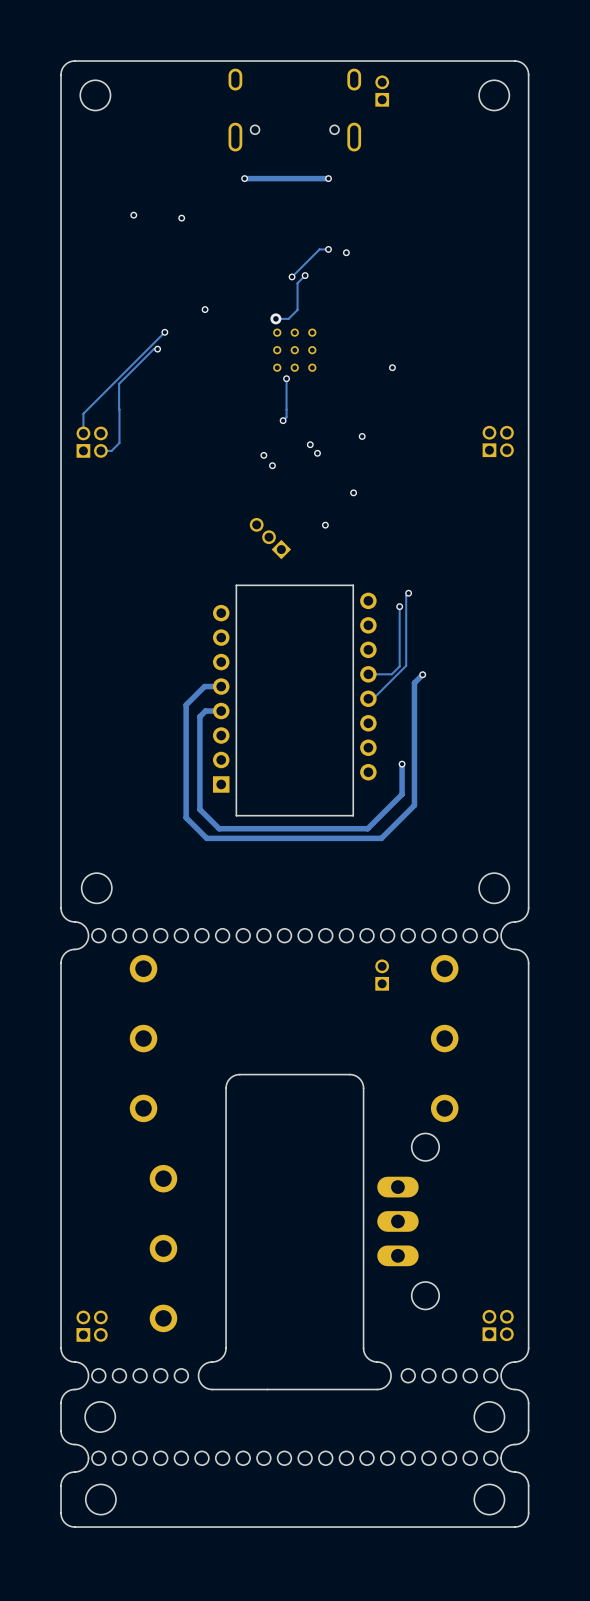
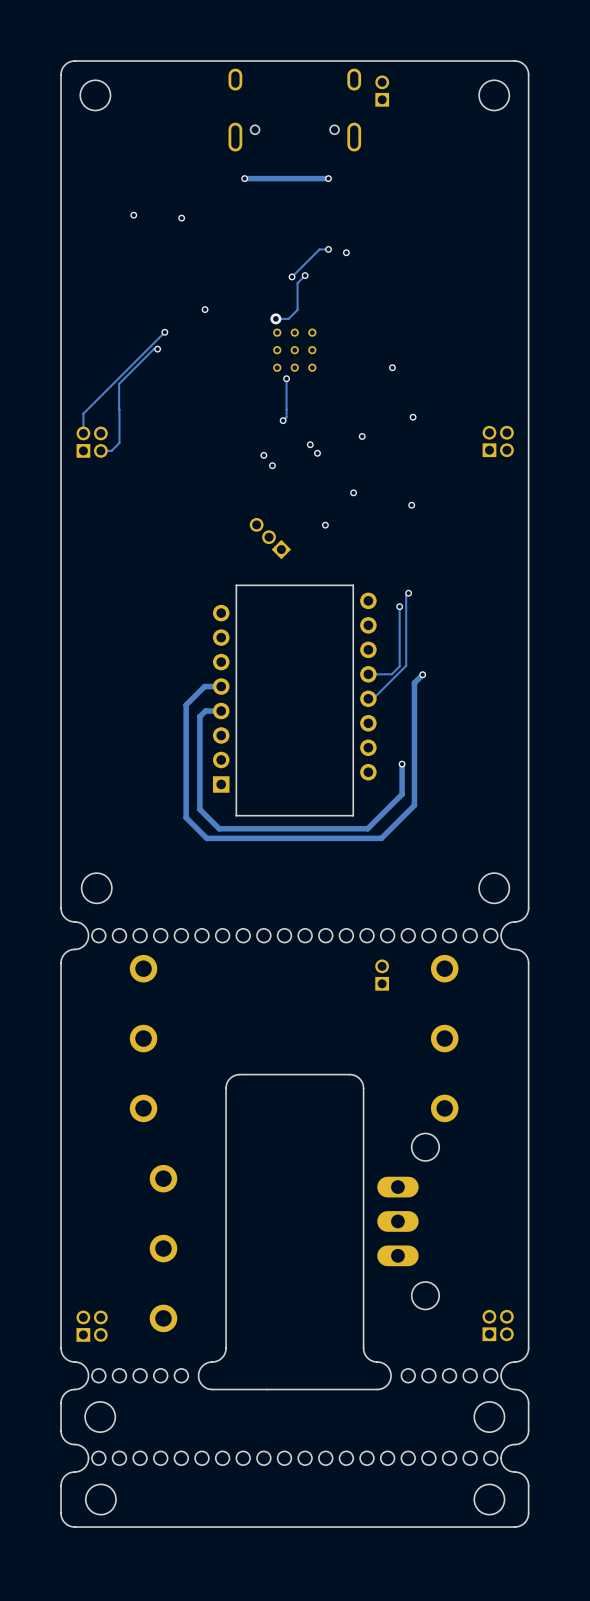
via: none -> (413, 417)
via: none -> (411, 505)

